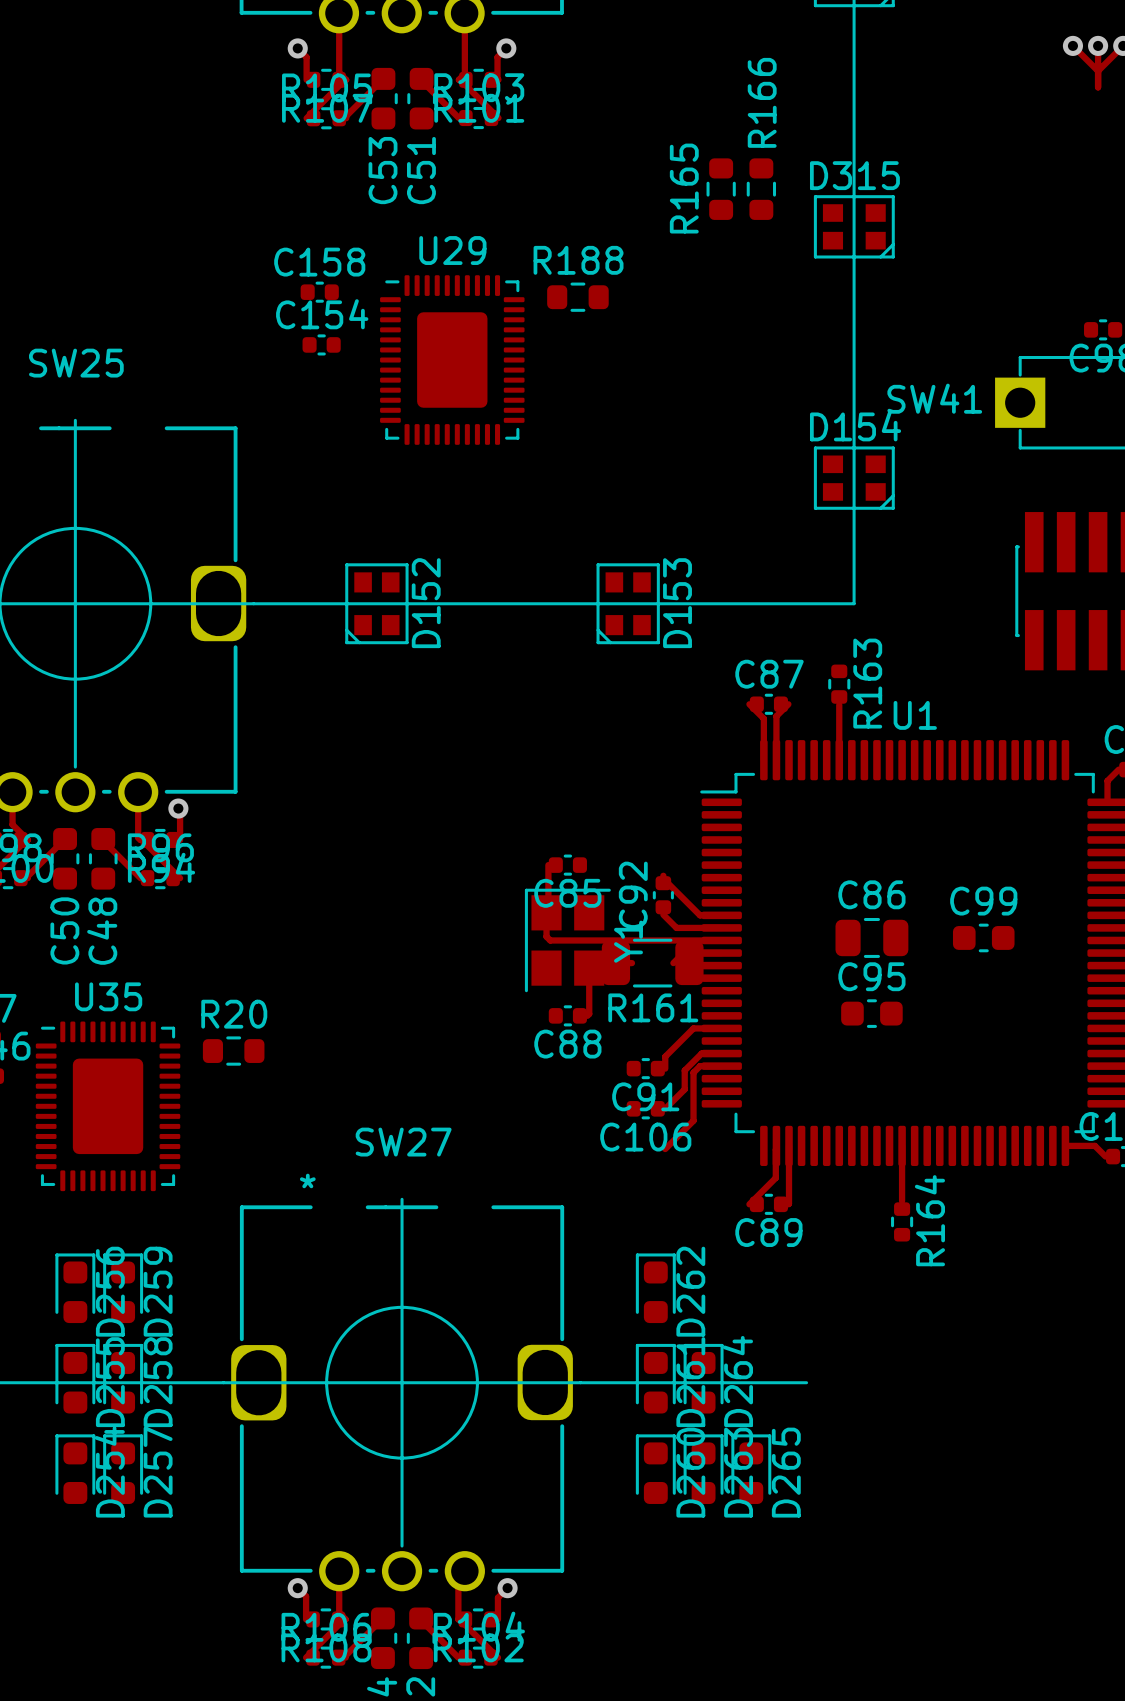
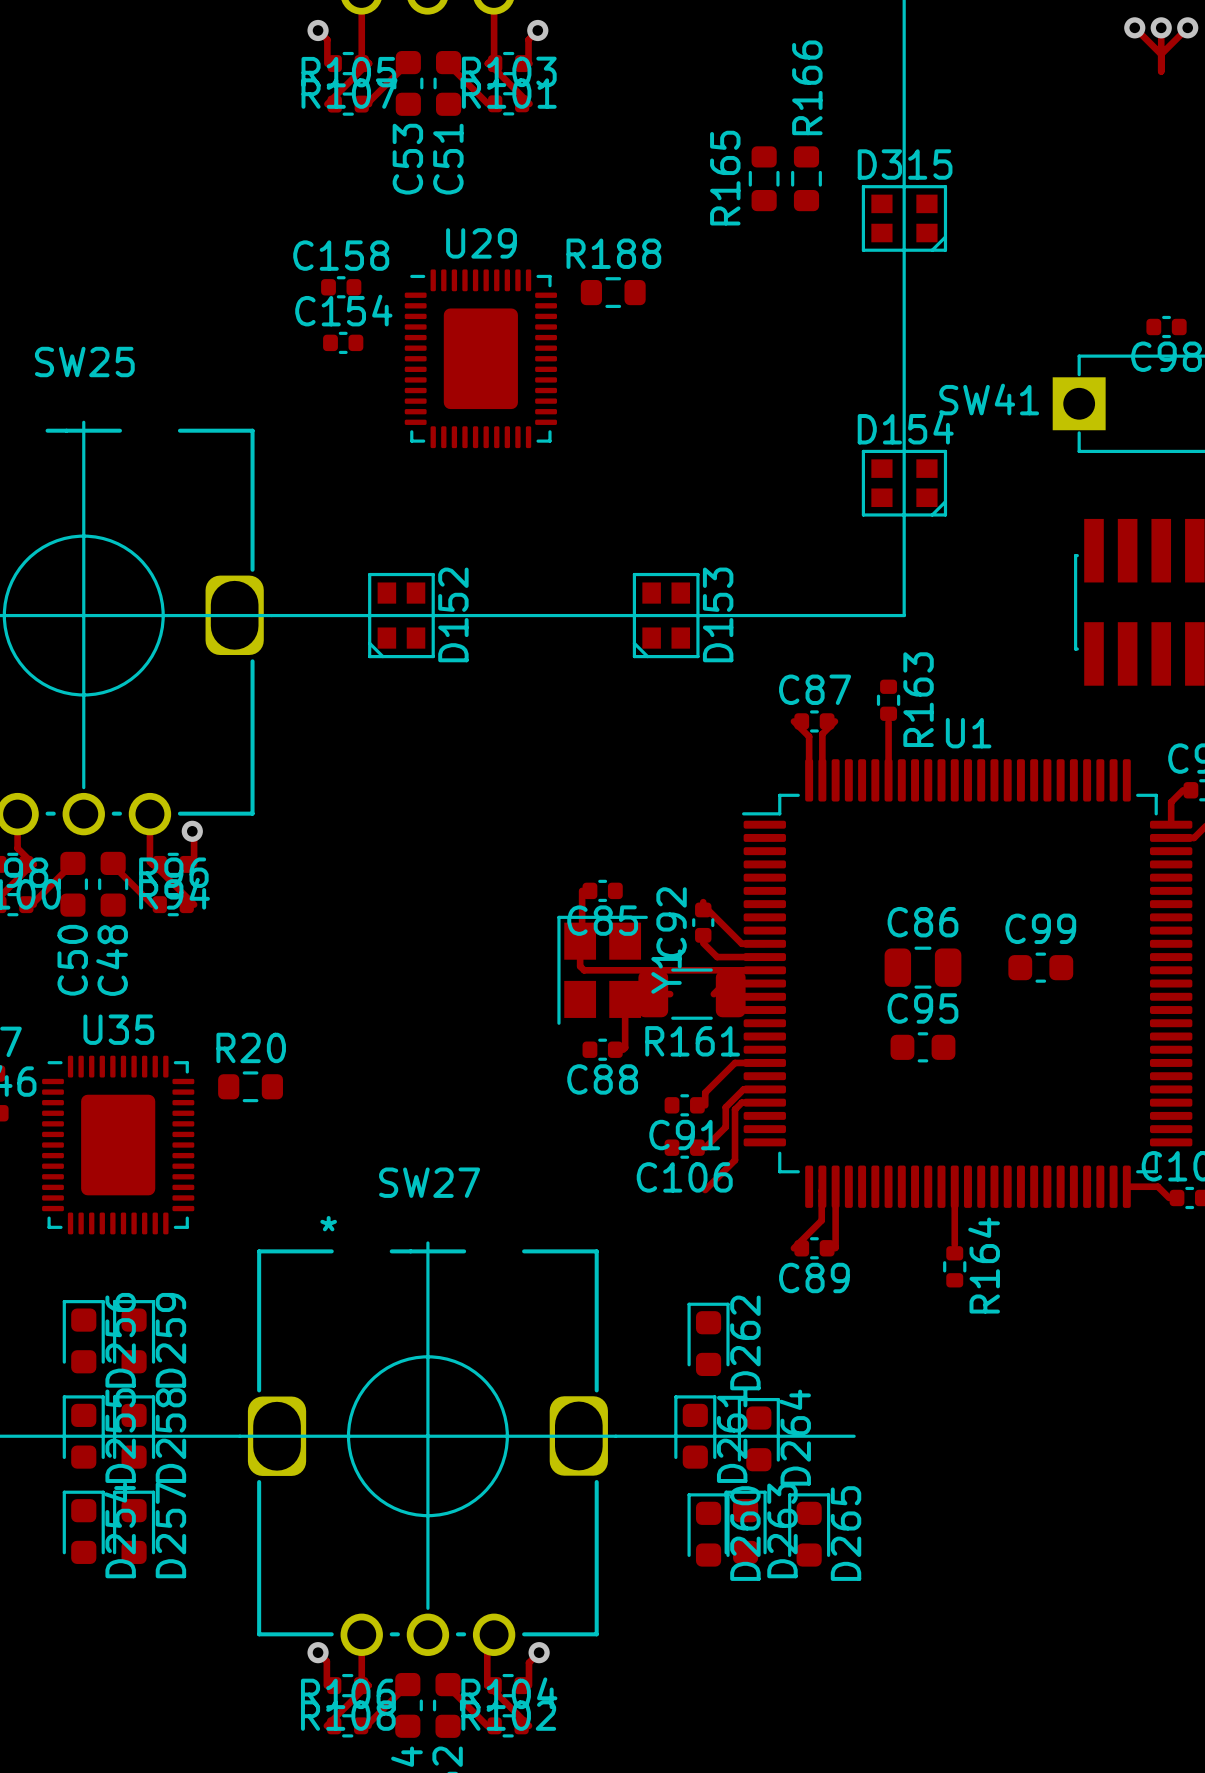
D262 position: (655, 1288) -> (708, 1339)
D264 position: (703, 1378) -> (758, 1434)
D260 position: (655, 1469) -> (708, 1529)
D265 position: (751, 1469) -> (809, 1529)

